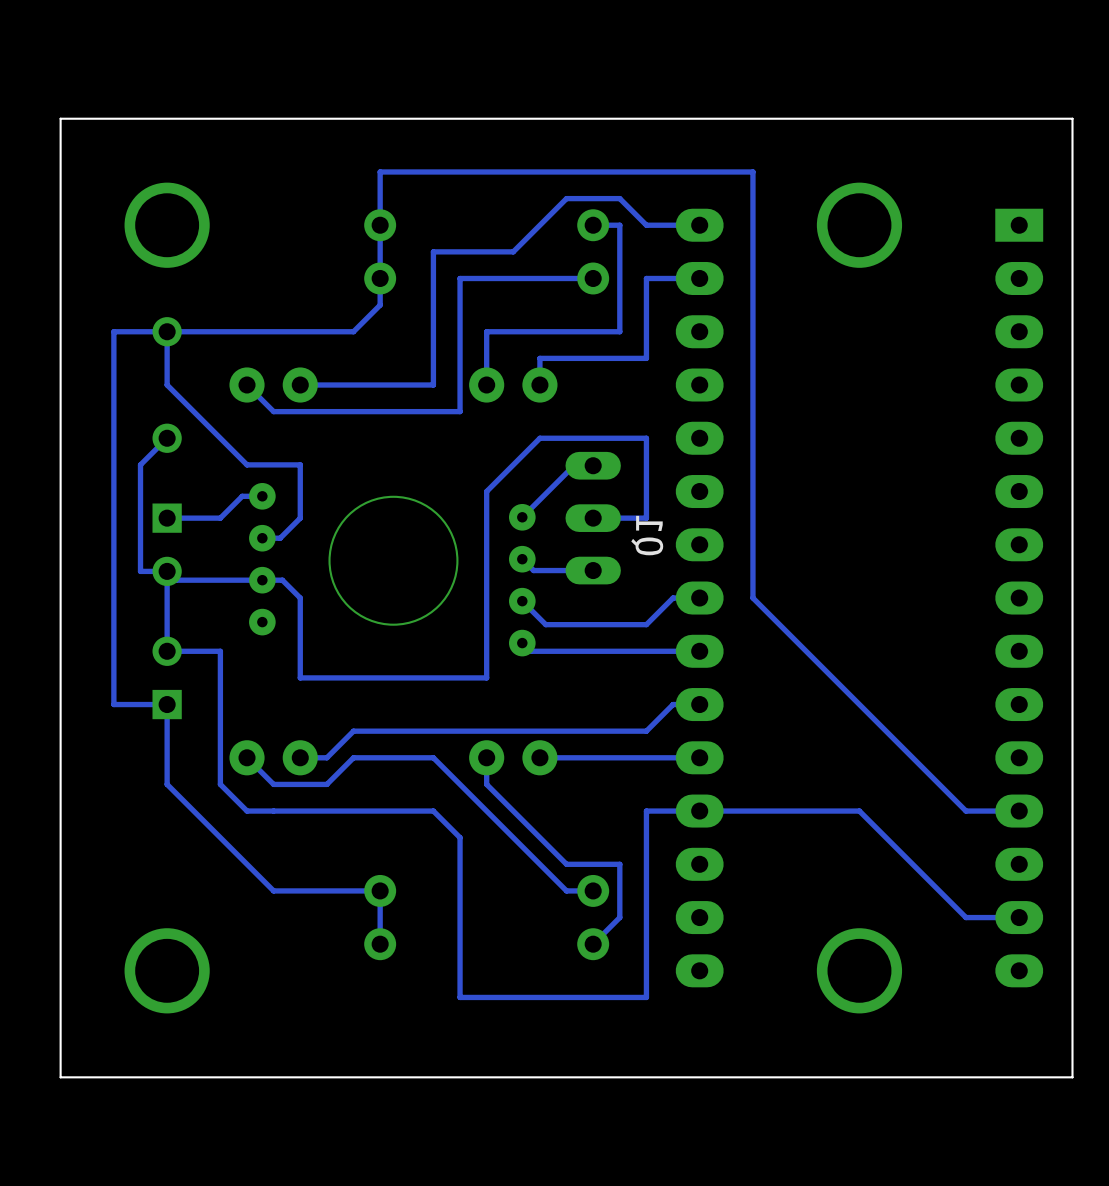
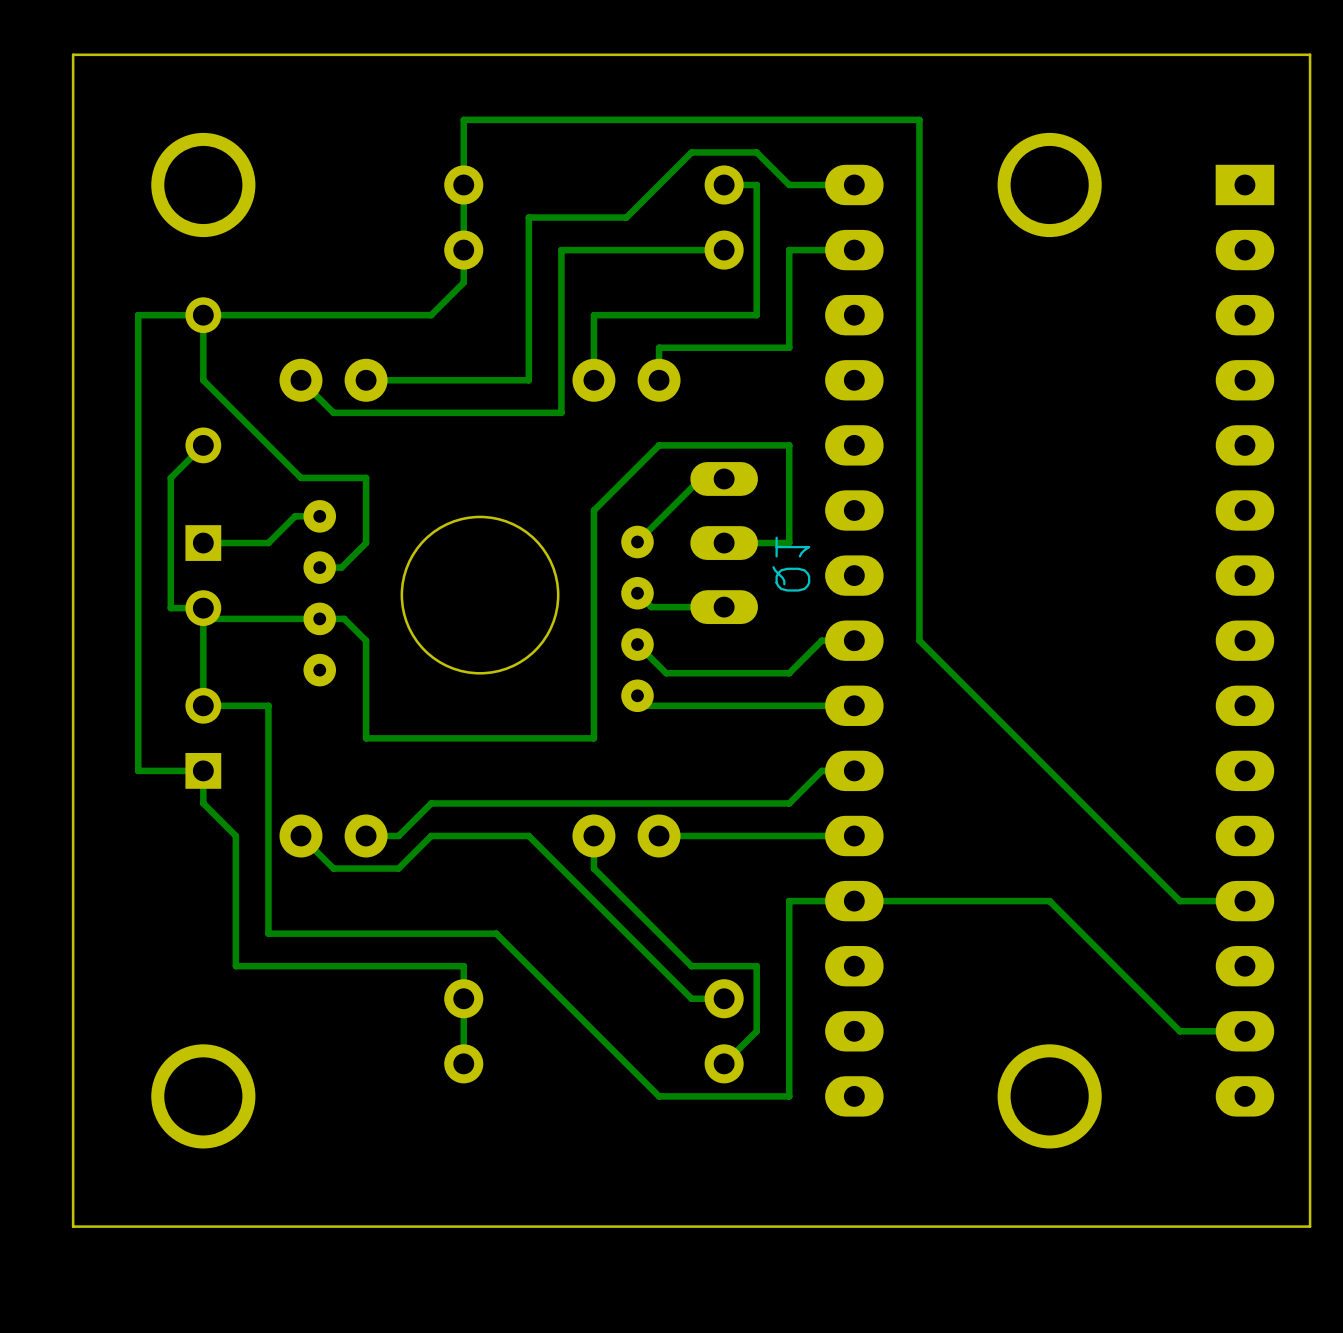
track: (167, 731) (167, 784) (273, 890) (380, 890) -> (203, 803) (235, 836) (235, 966) (463, 966) (463, 998)
track: (220, 784) (247, 811) (433, 811) (460, 837) (460, 997) (646, 997) (646, 970) -> (268, 868) (268, 933) (496, 933) (659, 1096) (789, 1096)

